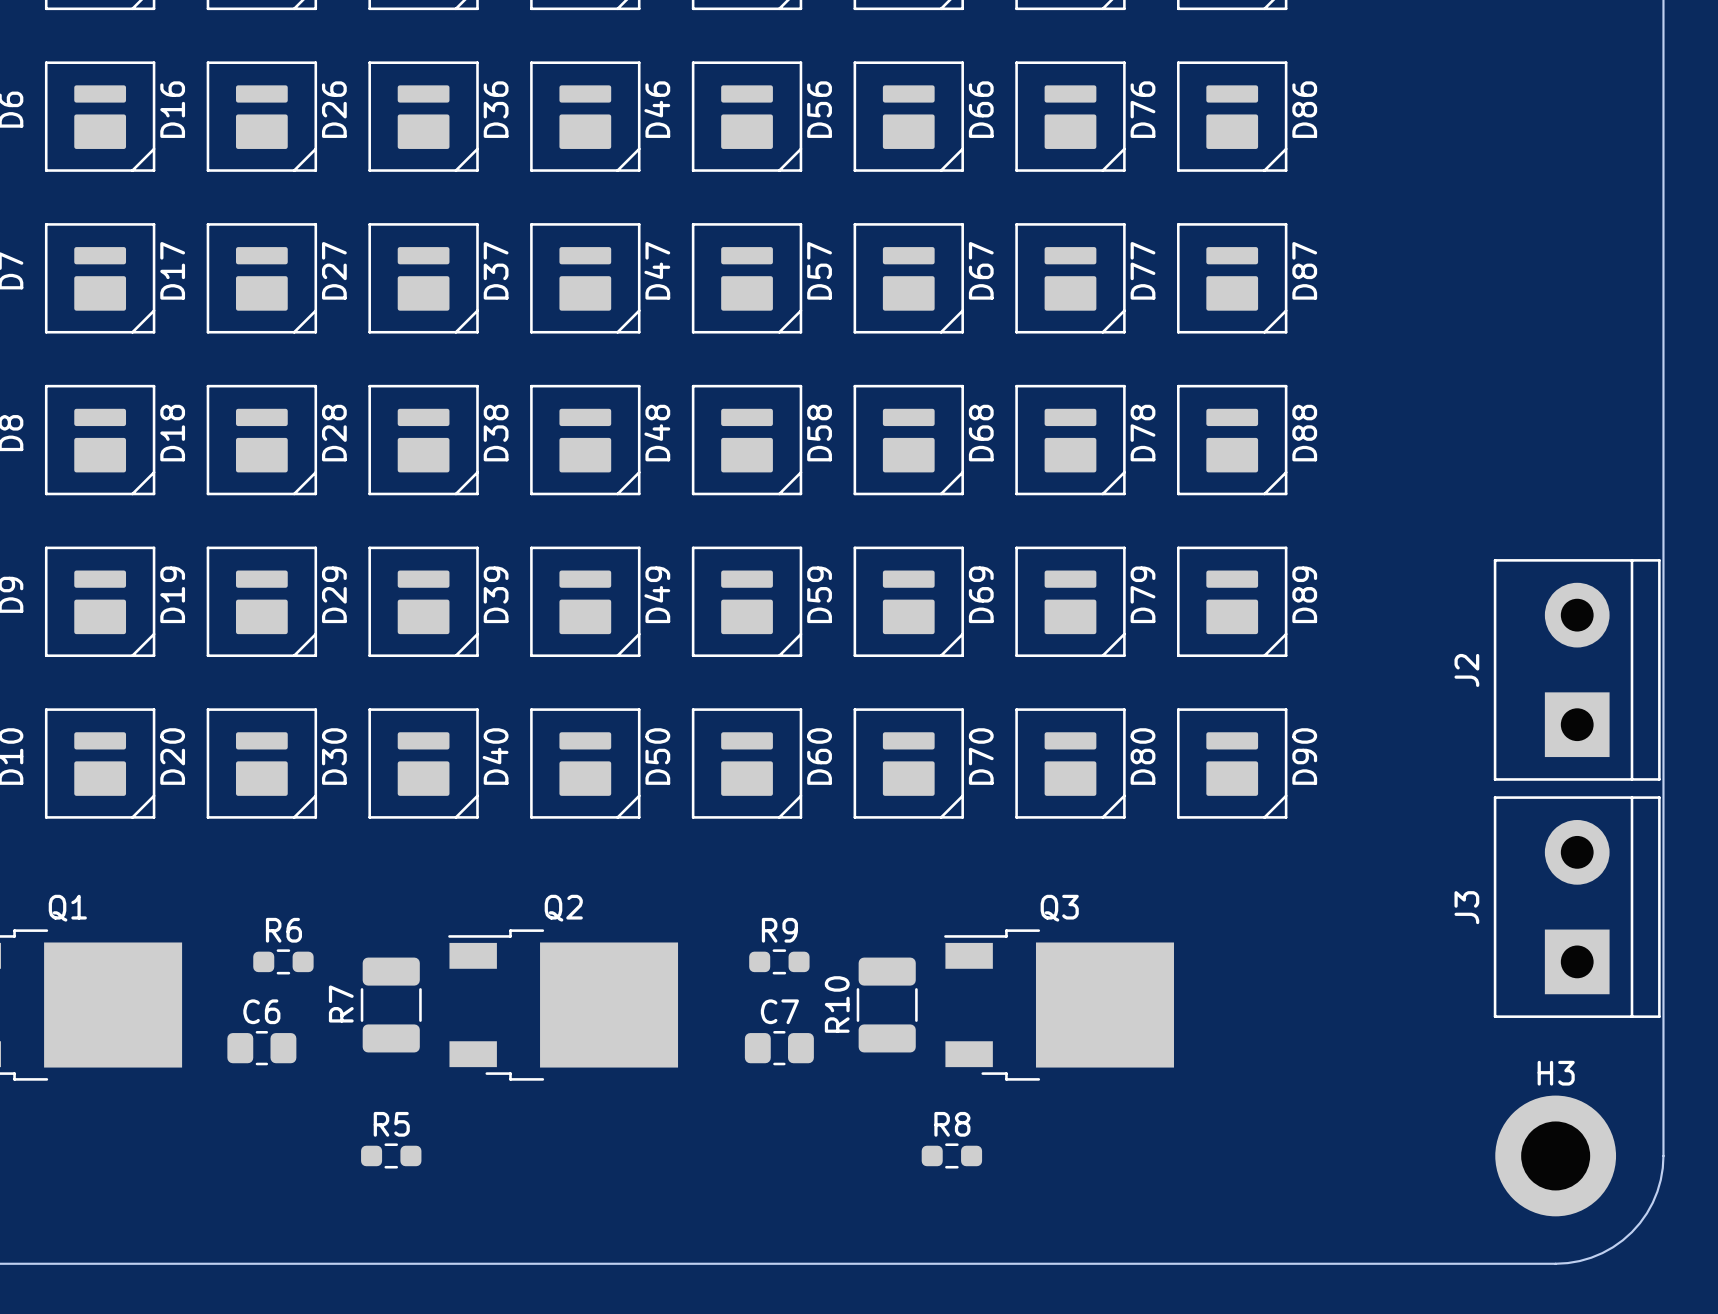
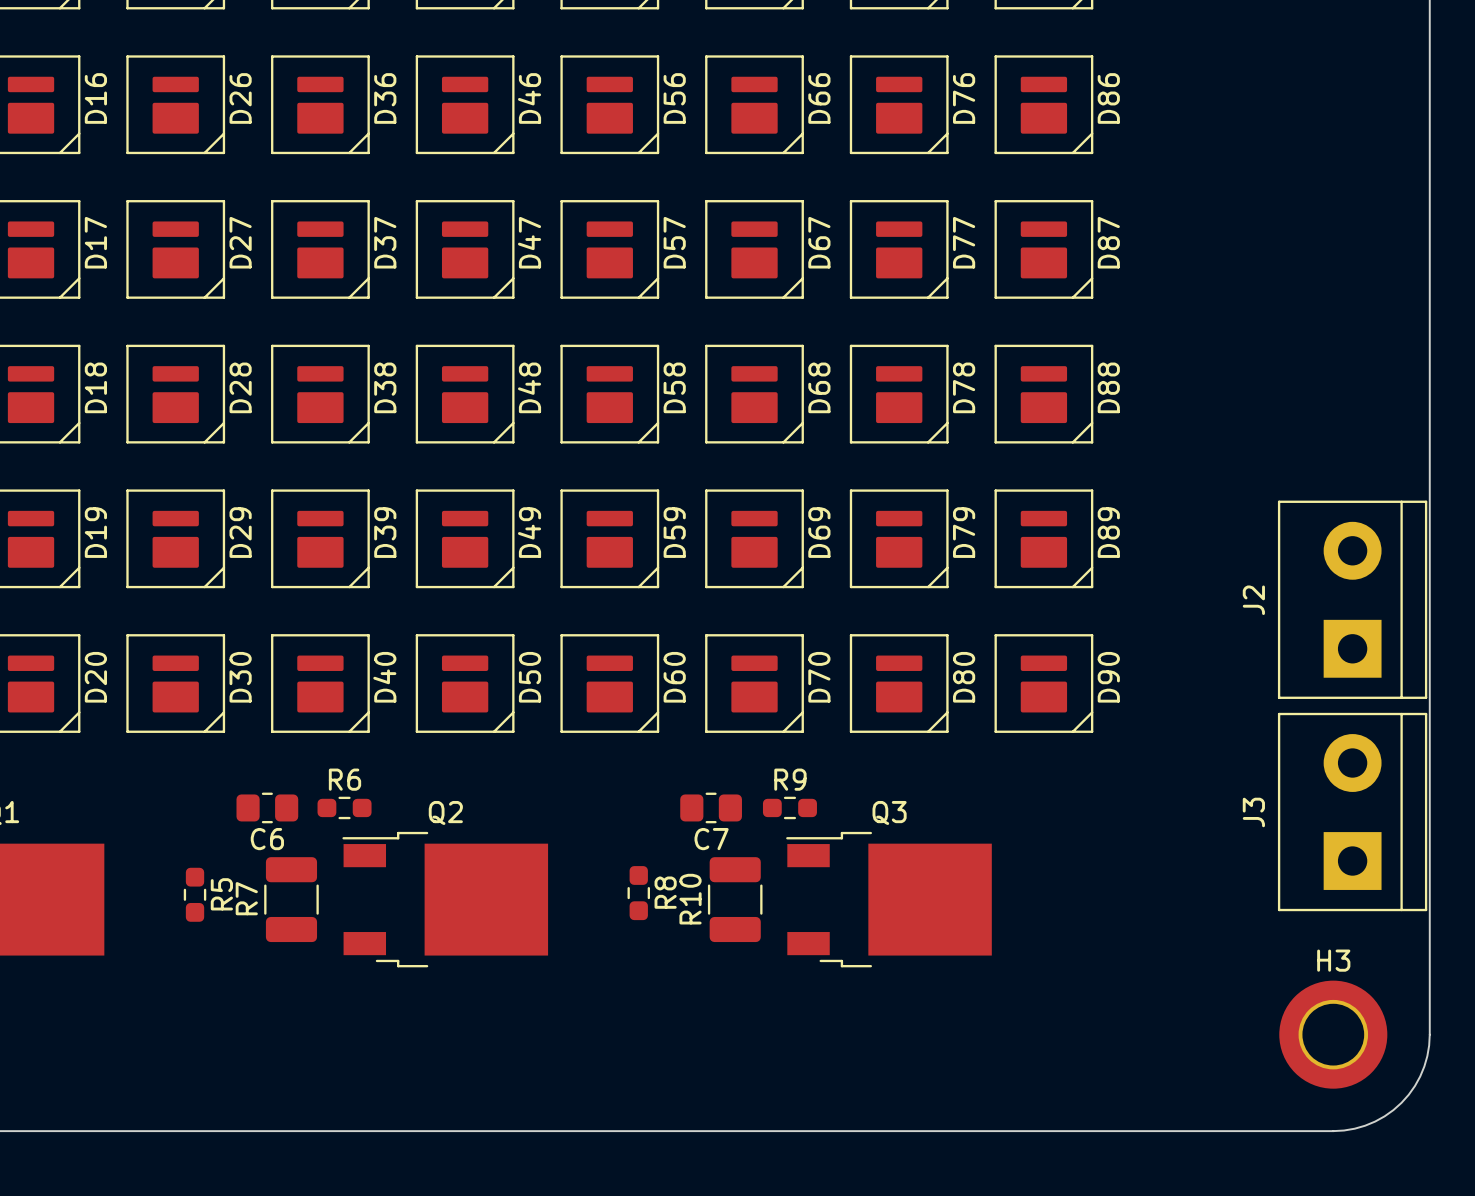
R6 position: (283, 961) -> (344, 807)
R9 position: (779, 961) -> (789, 807)
C6 name position: C6 (261, 1011) -> C6 (267, 839)
C7 name position: C7 (779, 1011) -> C7 (711, 839)
C6 position: (261, 1048) -> (267, 807)
C7 position: (779, 1048) -> (711, 807)
R5 rotation: 0° (391, 1155) -> 90° clockwise (195, 894)
R5 position: (391, 1155) -> (195, 894)
R8 rotation: 0° (951, 1155) -> 90° clockwise (638, 893)
R8 position: (951, 1155) -> (638, 893)

